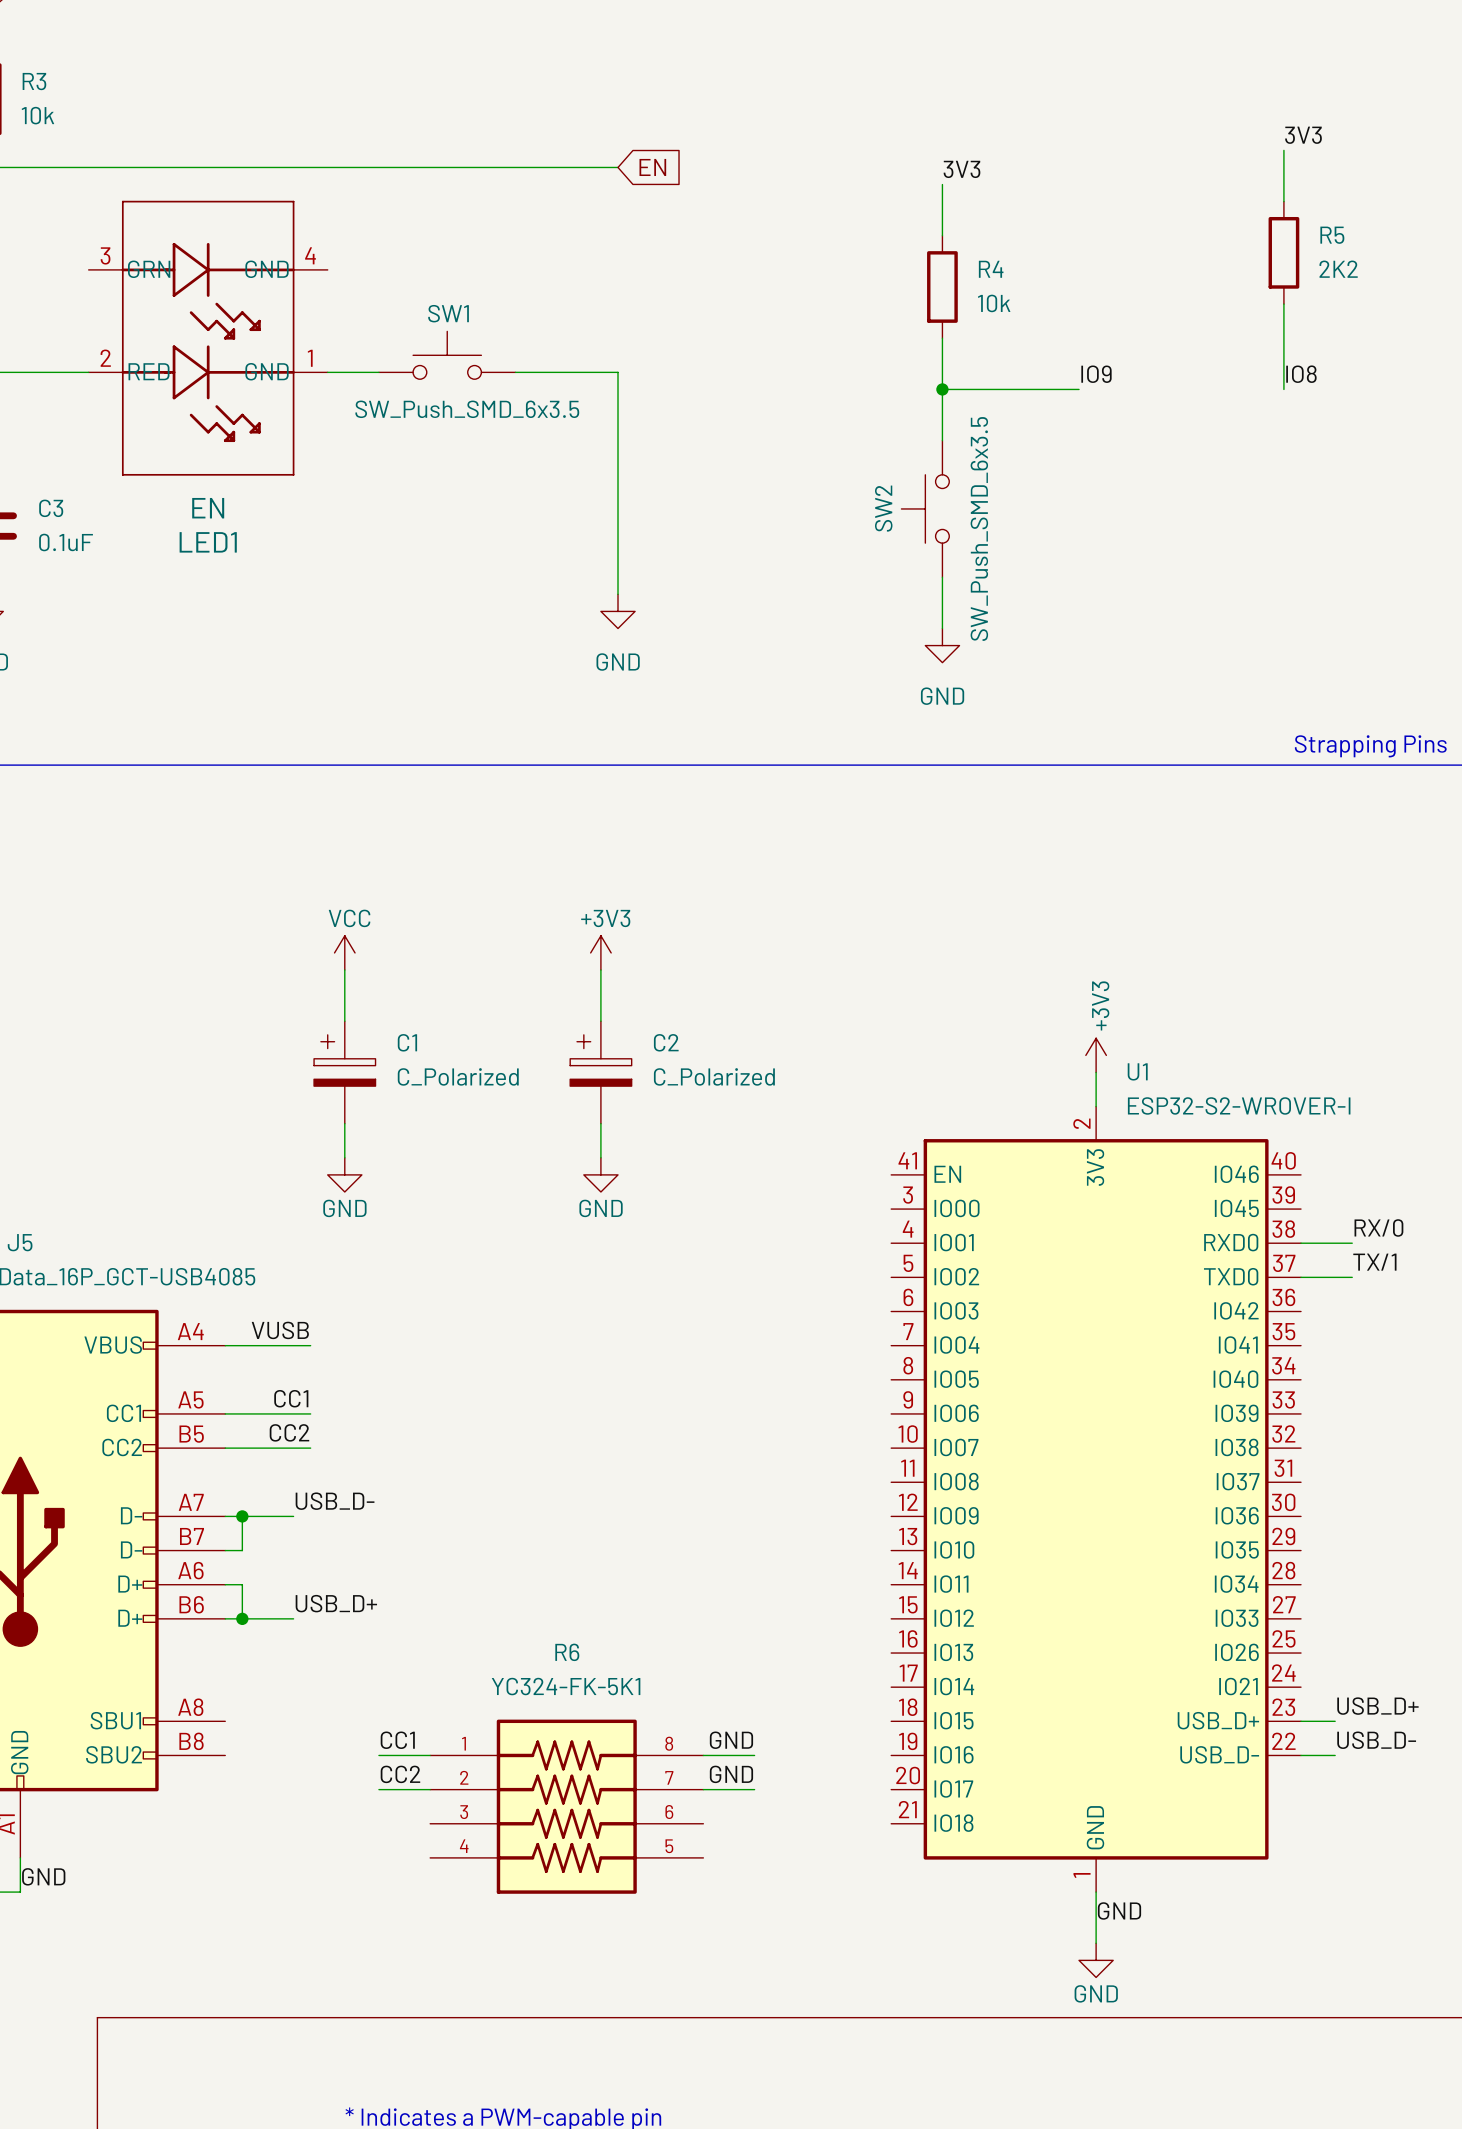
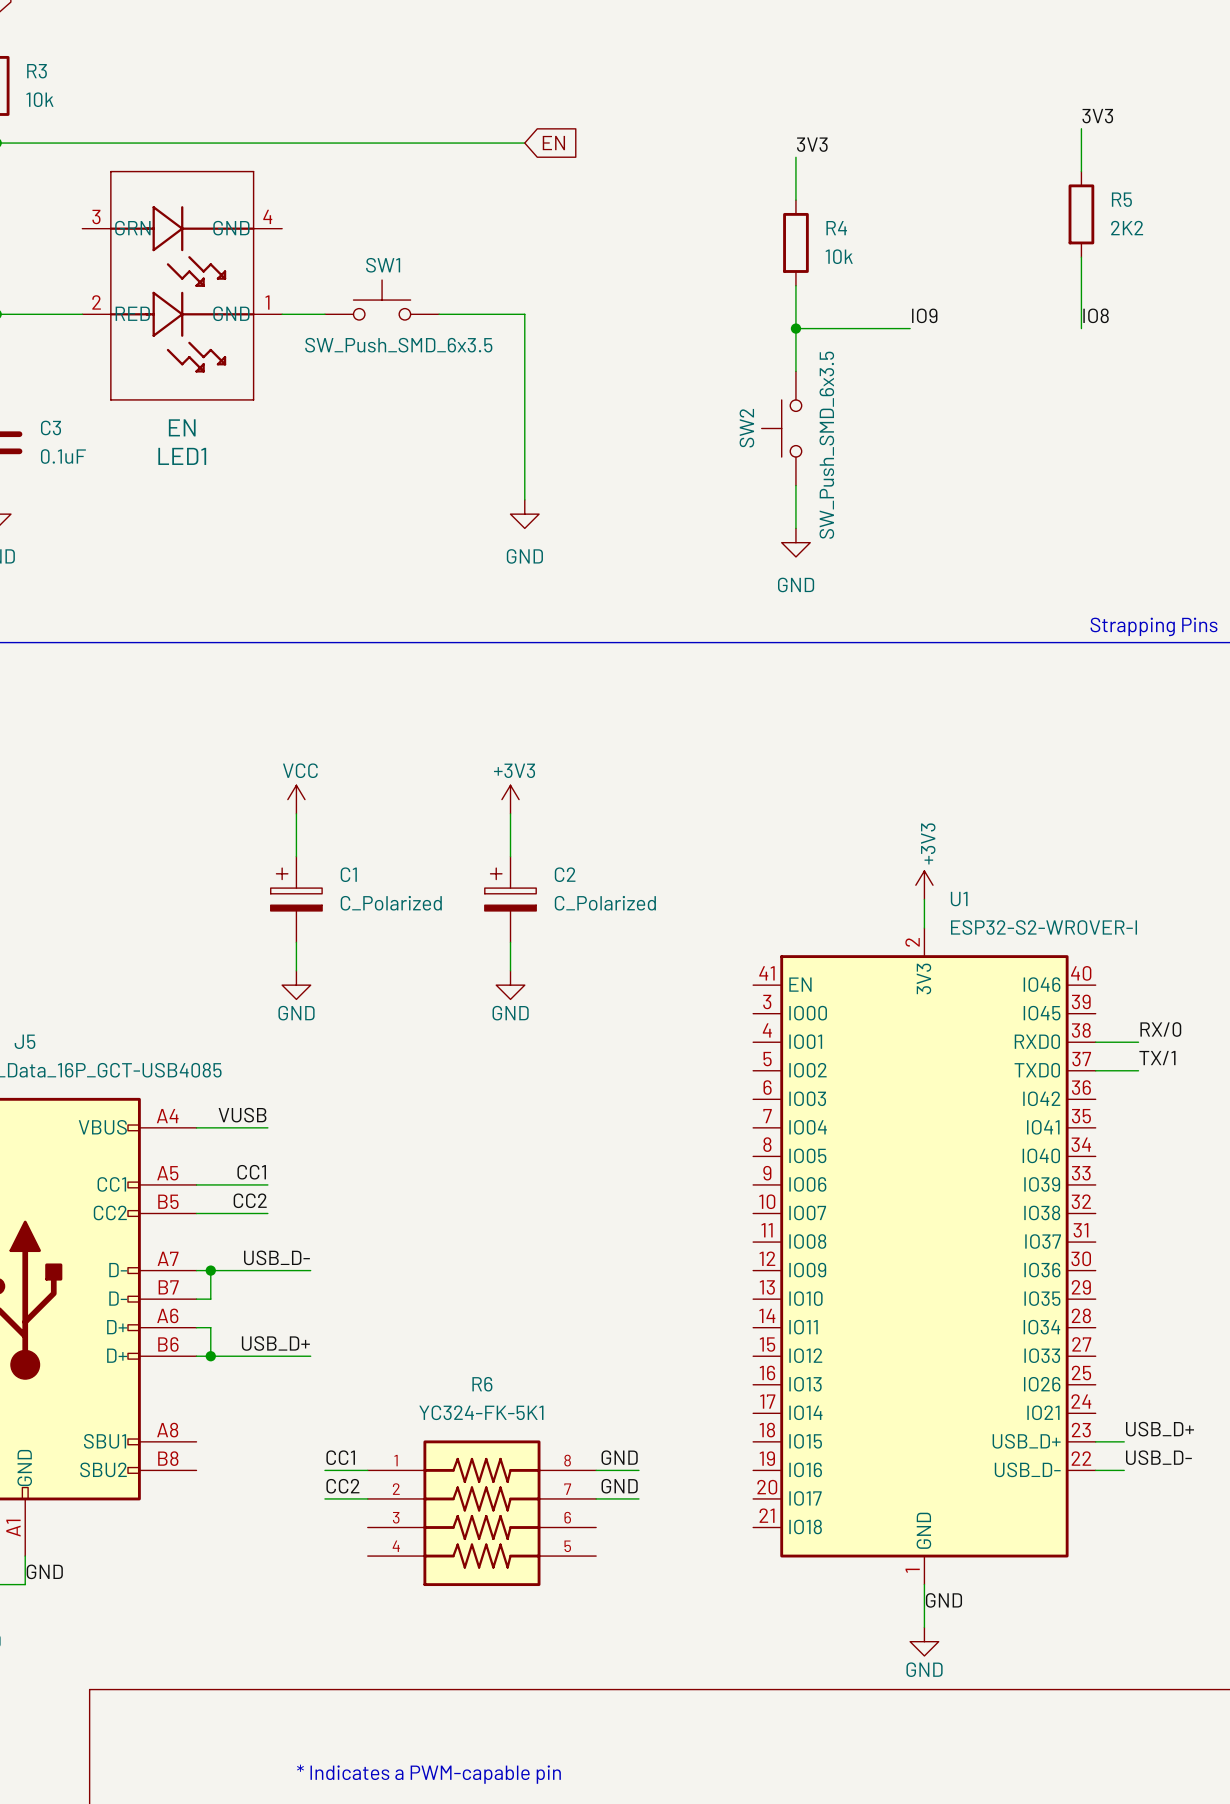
label position: USB_D- (335, 1501) -> USB_D- (276, 1257)
wire: none -> (253, 1270) (310, 1270)
label position: USB_D+ (336, 1603) -> USB_D+ (275, 1343)
wire: none -> (253, 1356) (310, 1356)

